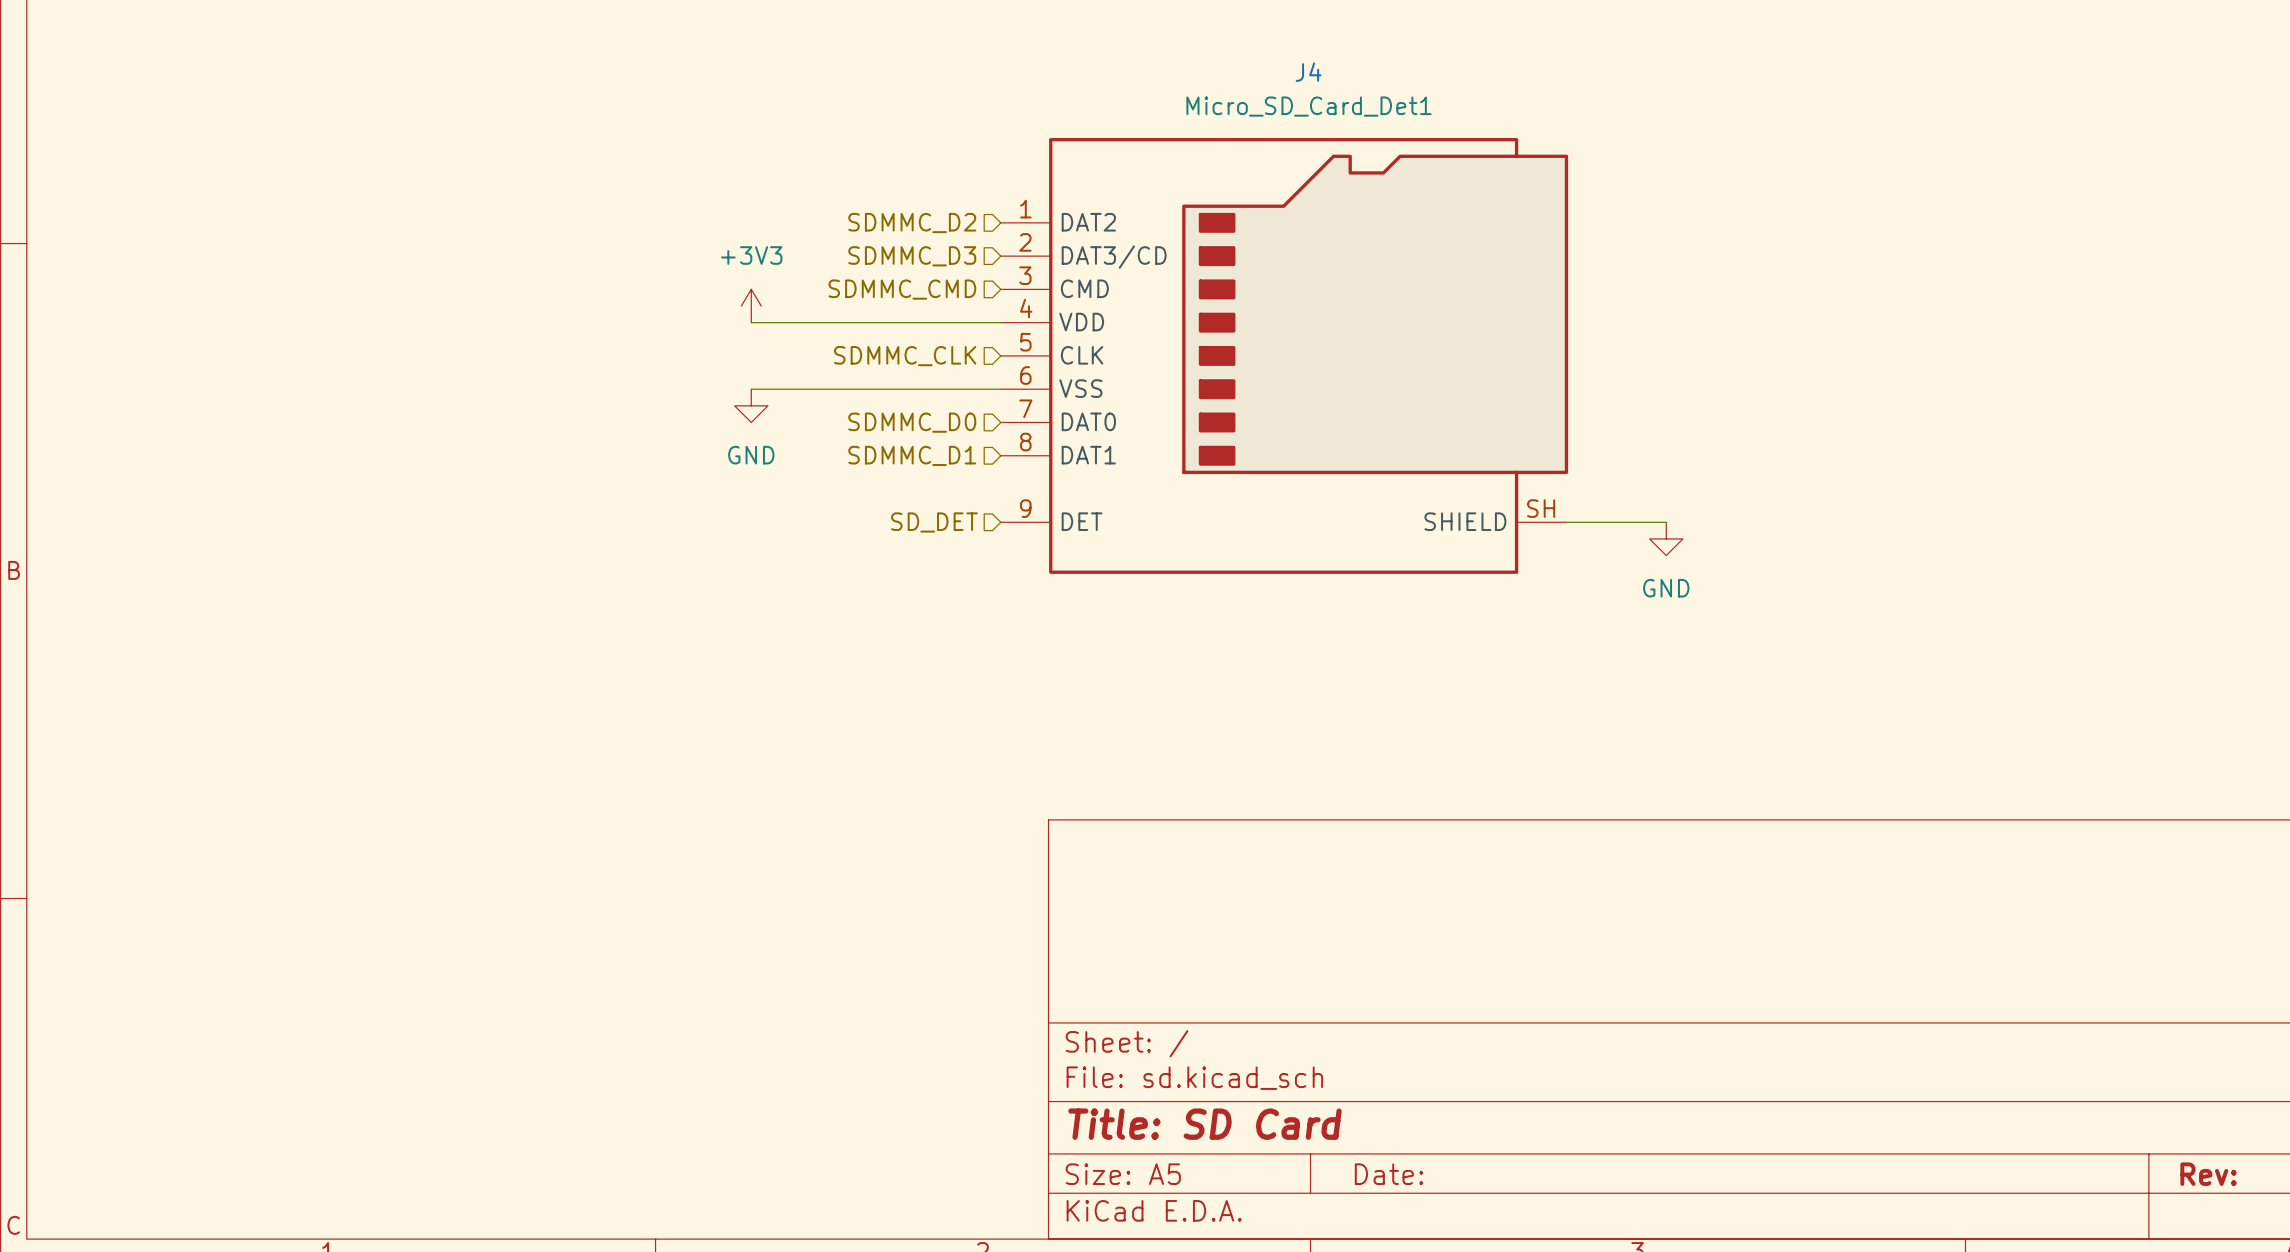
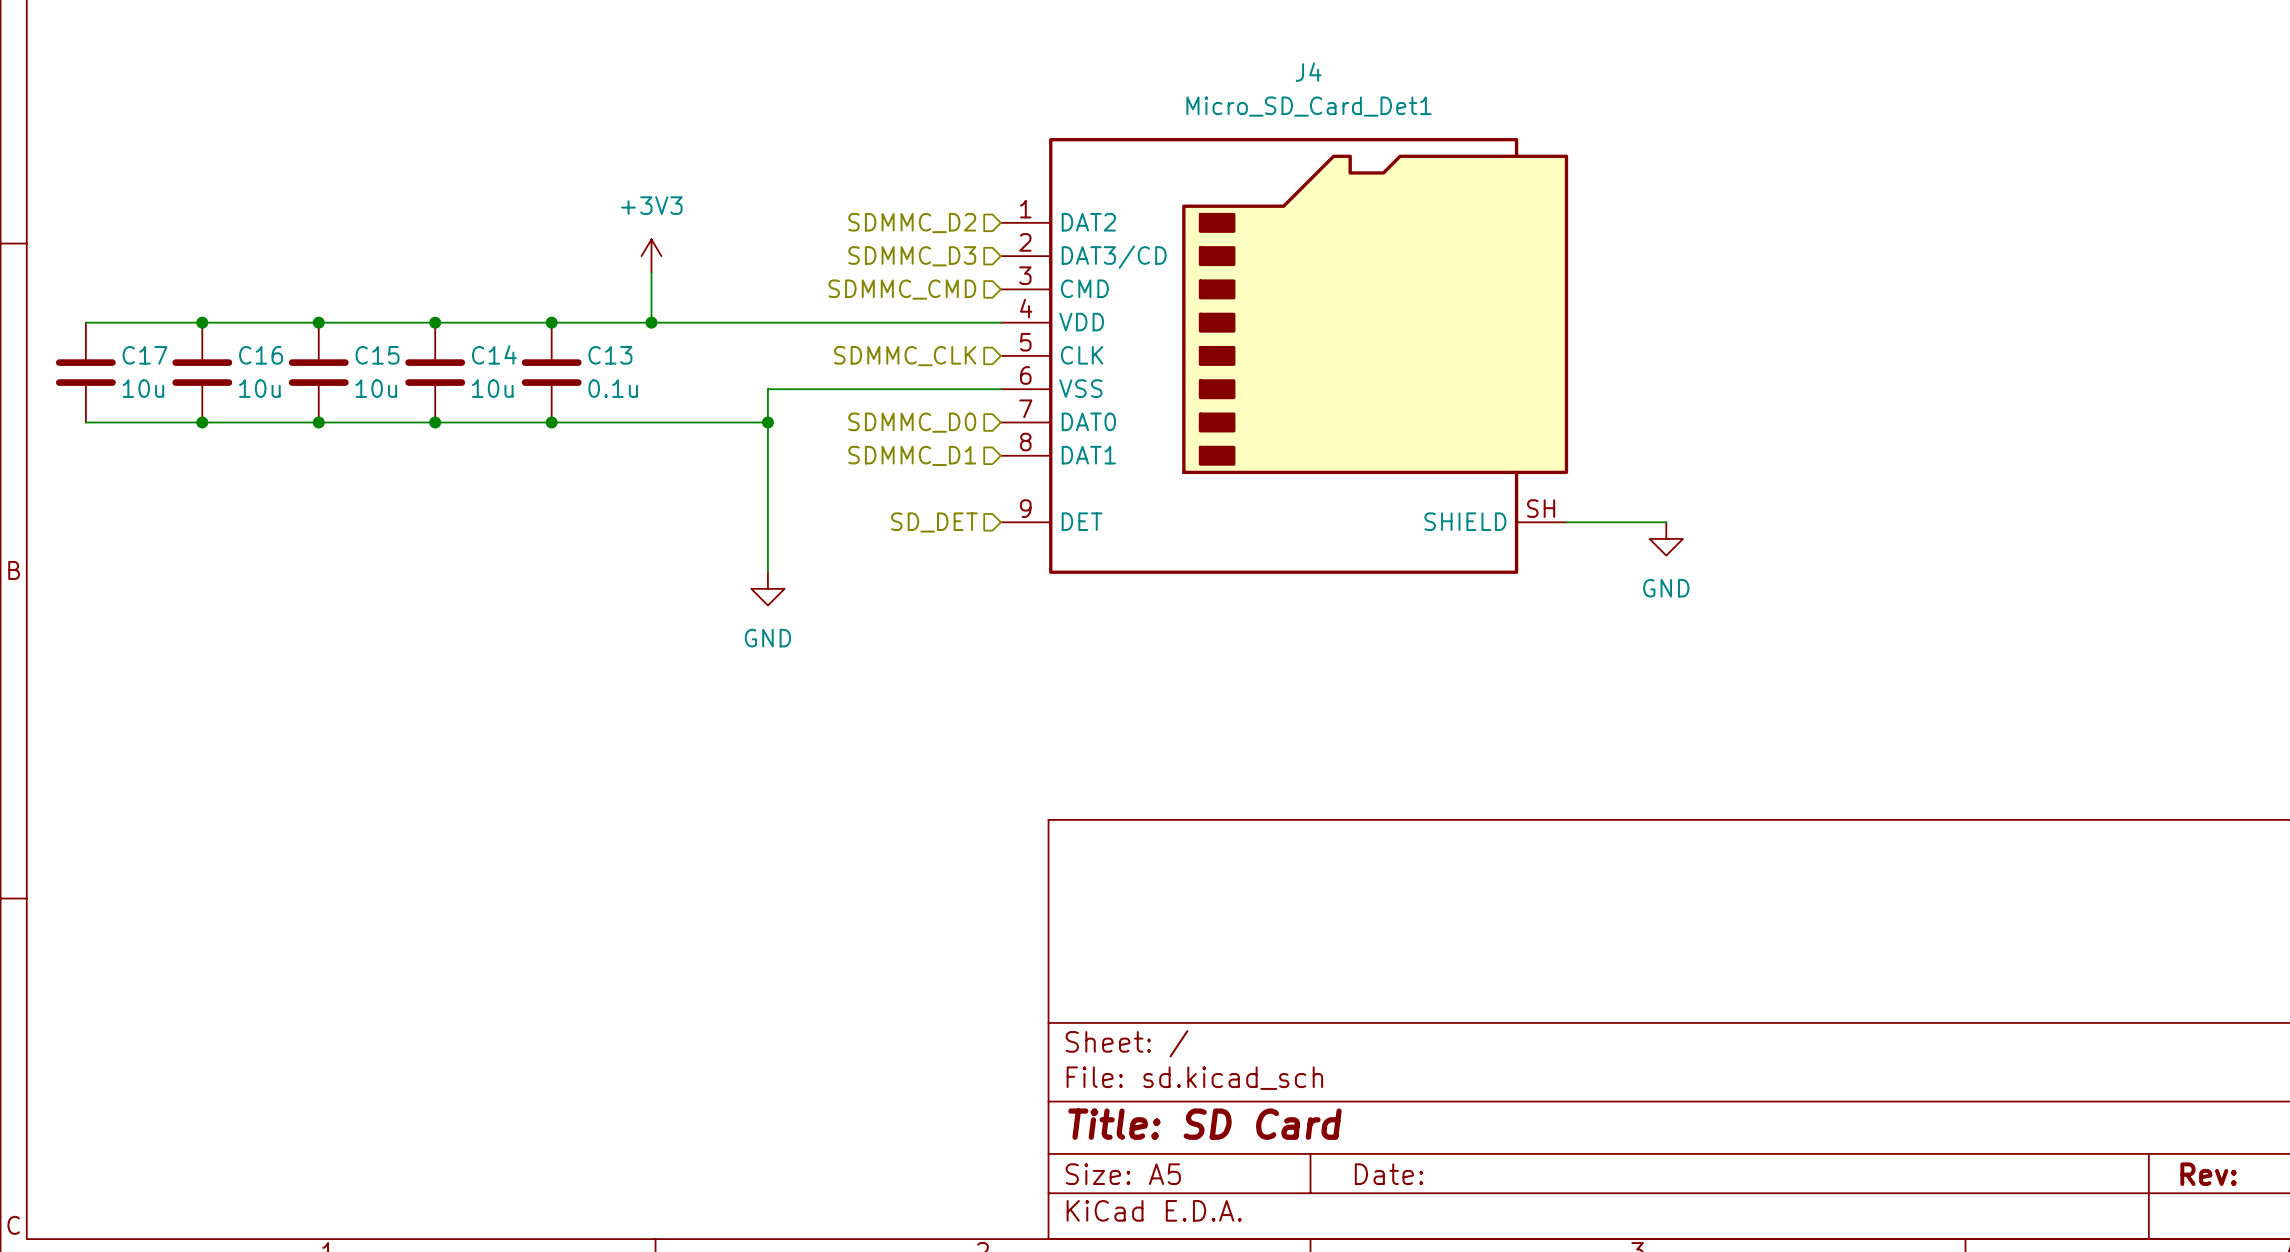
wire: none -> (651, 272) (651, 322)
power symbol position: +3V3 (751, 306) -> +3V3 (651, 256)
wire: none -> (85, 322) (751, 322)
junction: none -> (202, 322)
junction: none -> (318, 322)
junction: none -> (435, 322)
junction: none -> (551, 322)
junction: none -> (651, 322)
C17: none -> 10u (85, 372)
C16: none -> 10u (202, 372)
C15: none -> 10u (318, 372)
C14: none -> 10u (435, 372)
C13: none -> 0.1u (551, 372)
wire: (751, 389) (767, 389) -> (767, 572) (767, 389)
power symbol position: GND (751, 405) -> GND (767, 588)
wire: none -> (85, 422) (767, 422)
junction: none -> (202, 422)
junction: none -> (318, 422)
junction: none -> (435, 422)
junction: none -> (551, 422)
junction: none -> (767, 422)

